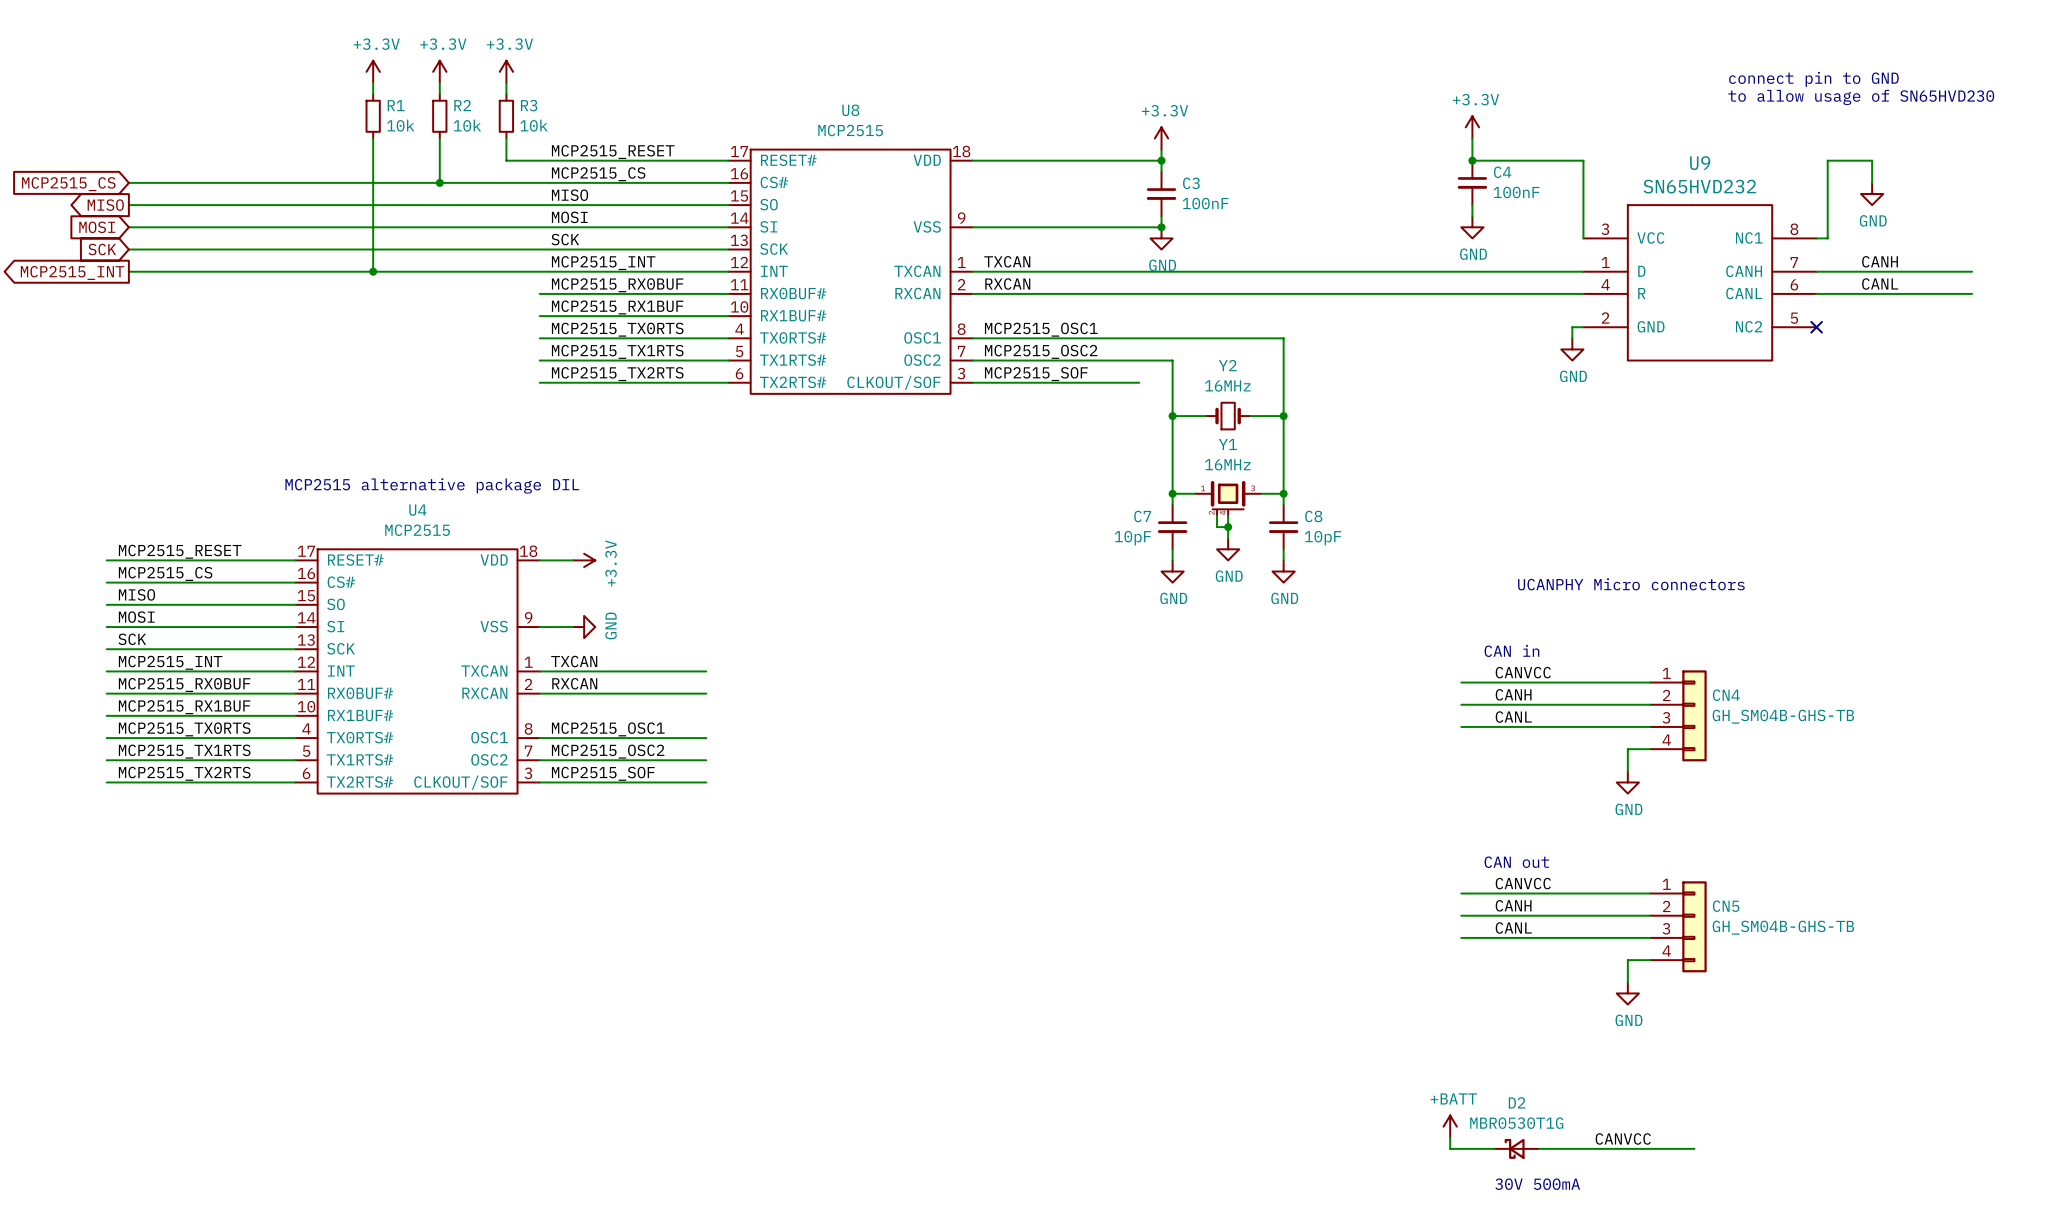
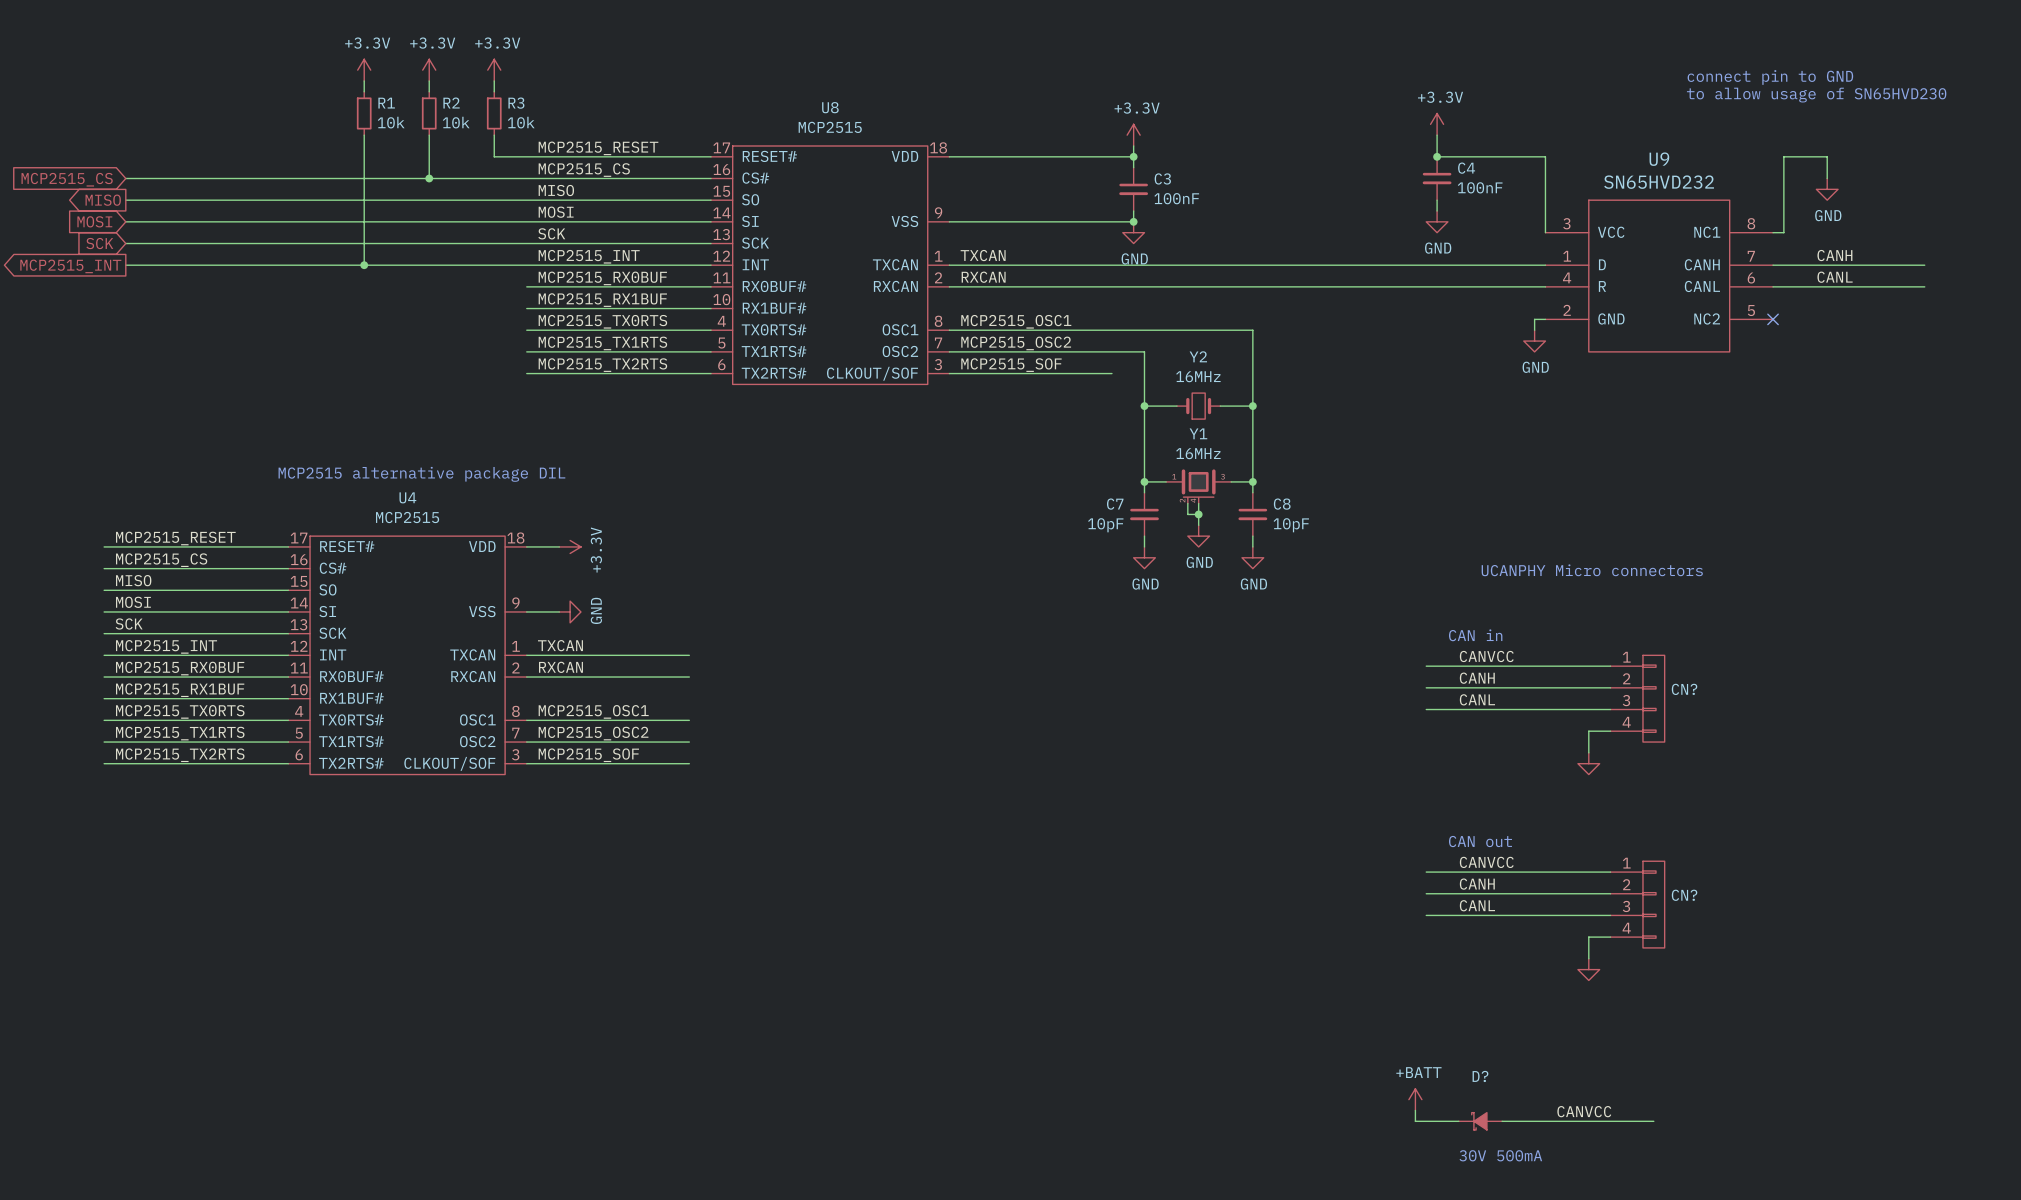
CN?: none -> (1637, 698)
CN4: GH_SM04B-GHS-TB (1678, 715) -> none
power symbol text: GND (1628, 809) -> none
CN?: none -> (1637, 904)
CN5: GH_SM04B-GHS-TB (1678, 926) -> none
power symbol text: GND (1628, 1020) -> none
D2: MBR0530T1G (1516, 1148) -> none
D?: none -> (1480, 1121)

